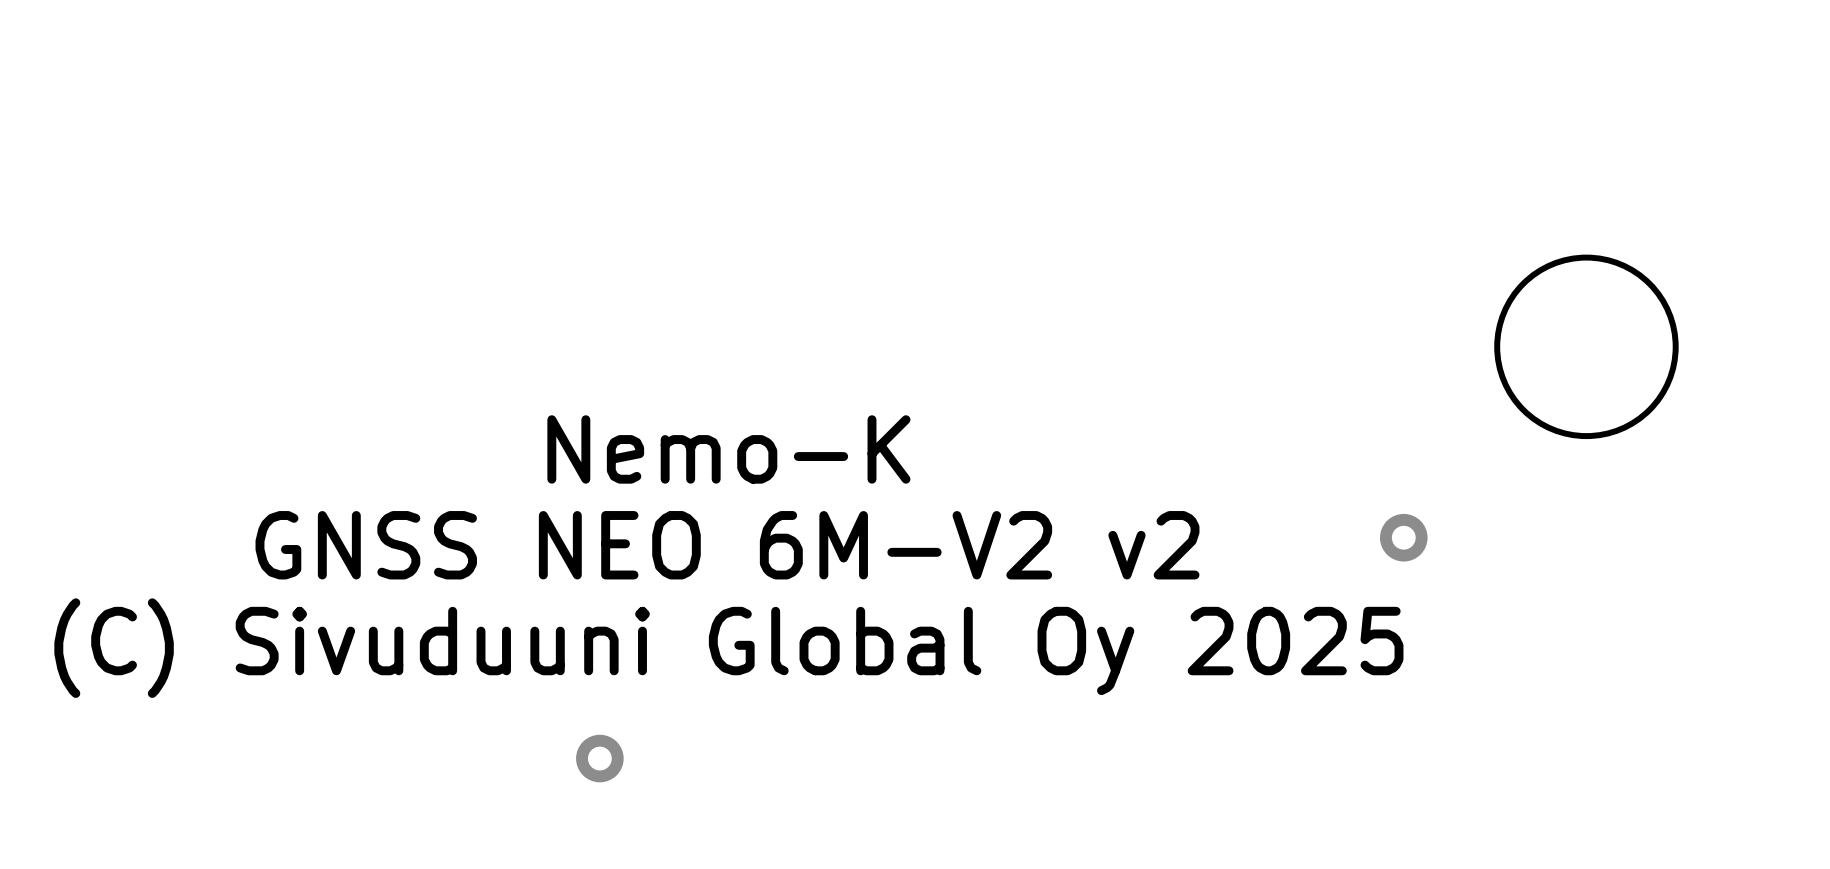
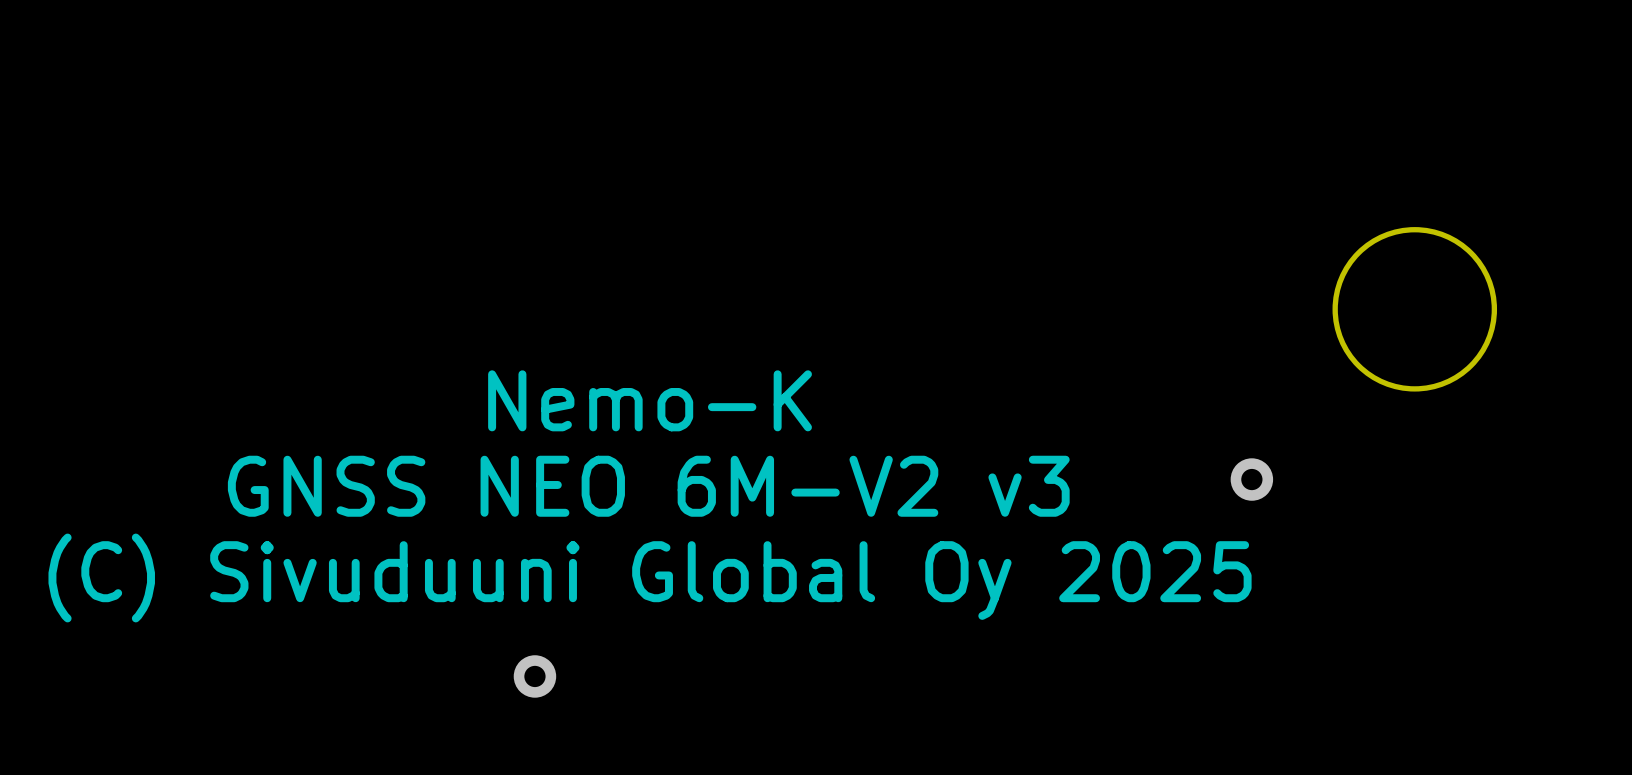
text: GNSS NEO 6M-V2 v2 (727, 545) -> GNSS NEO 6M-V2 v3 (648, 486)

